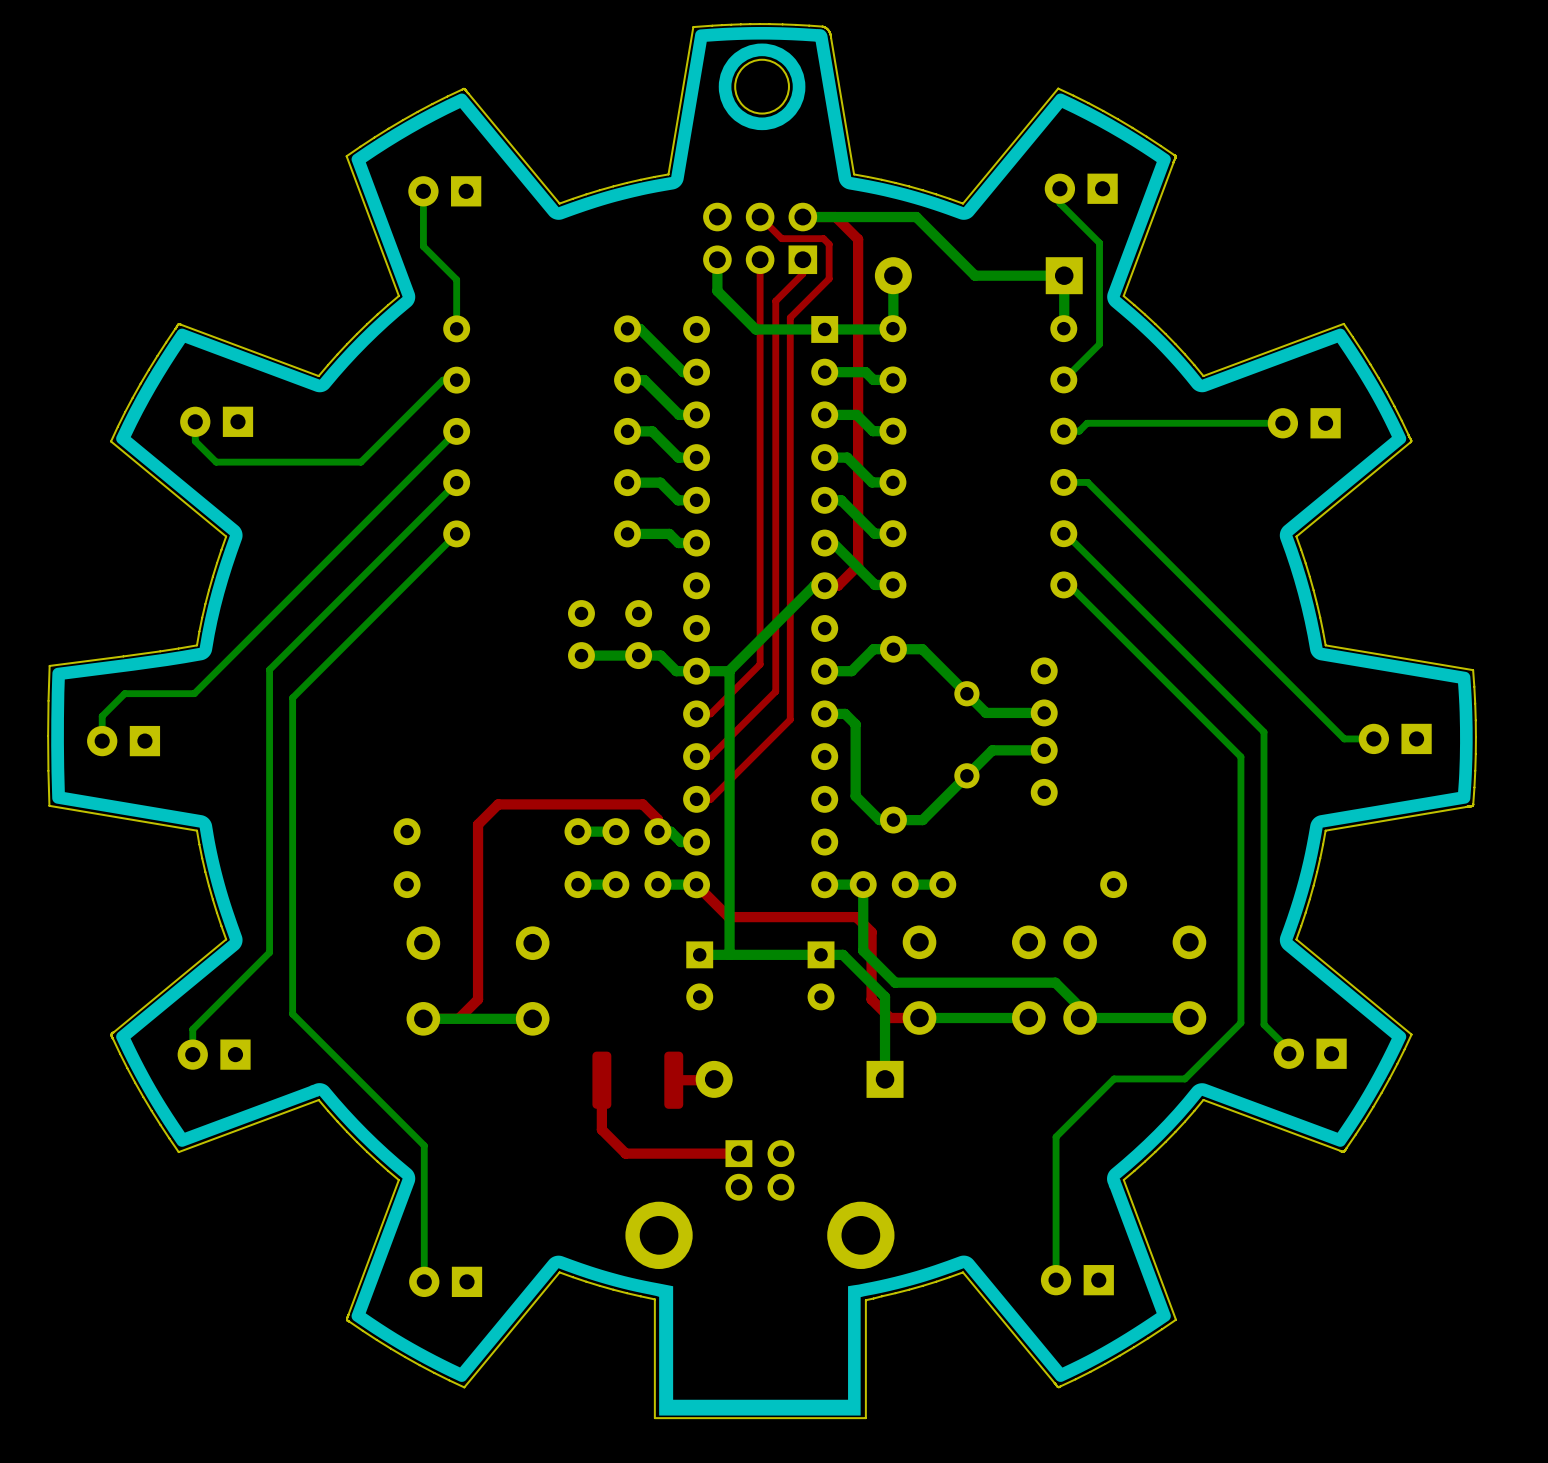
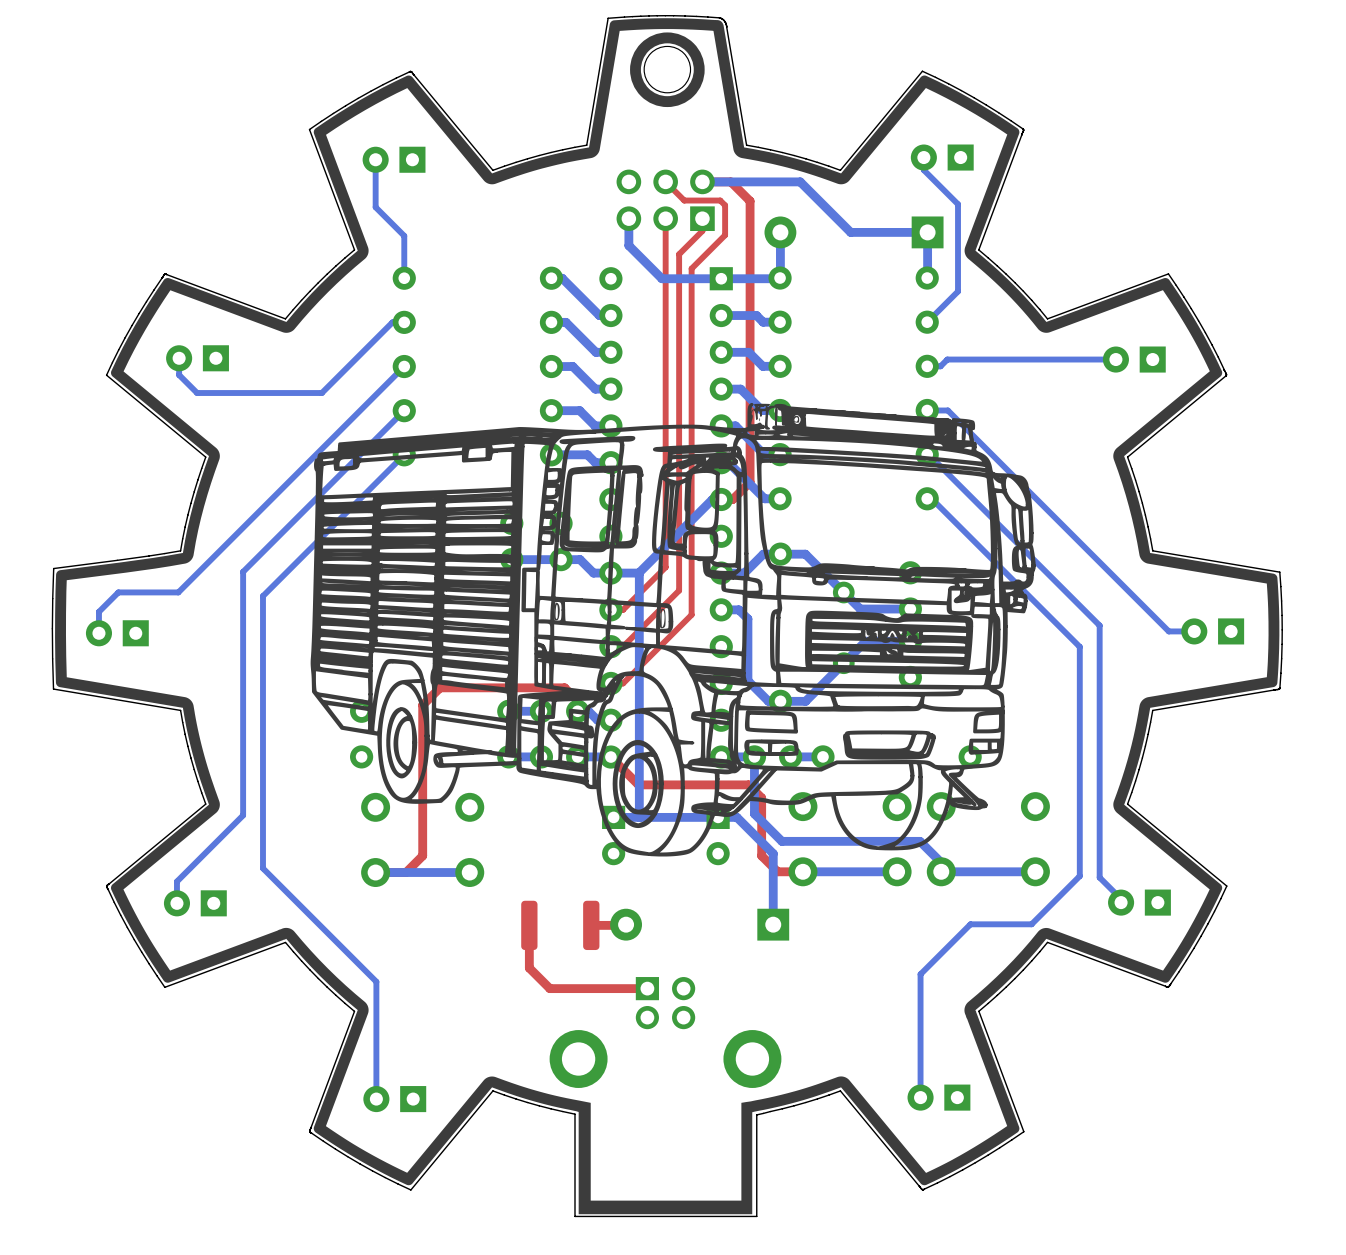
drawing: none -> [310, 402, 1036, 857]

